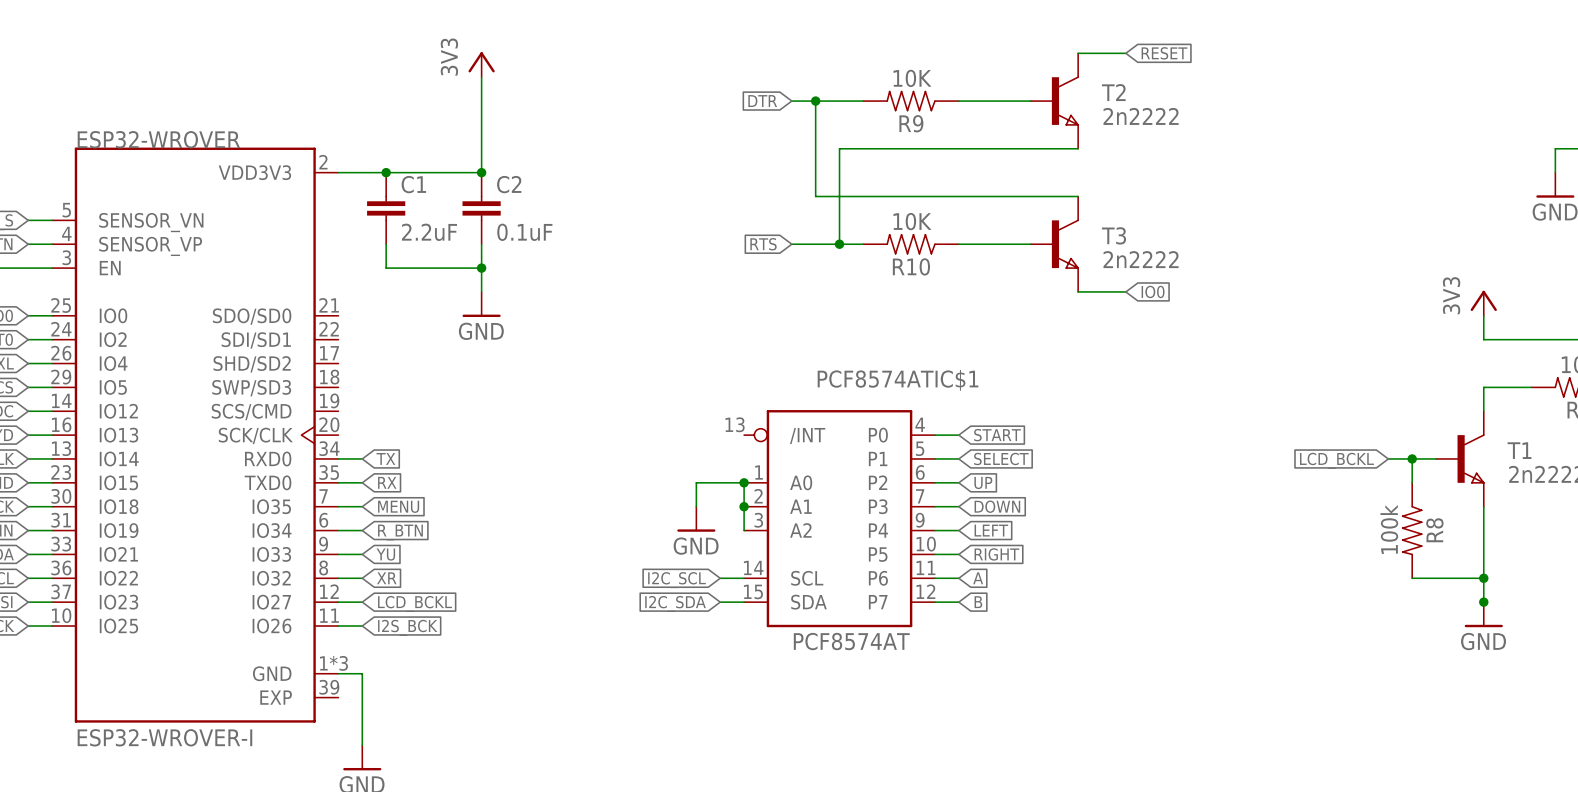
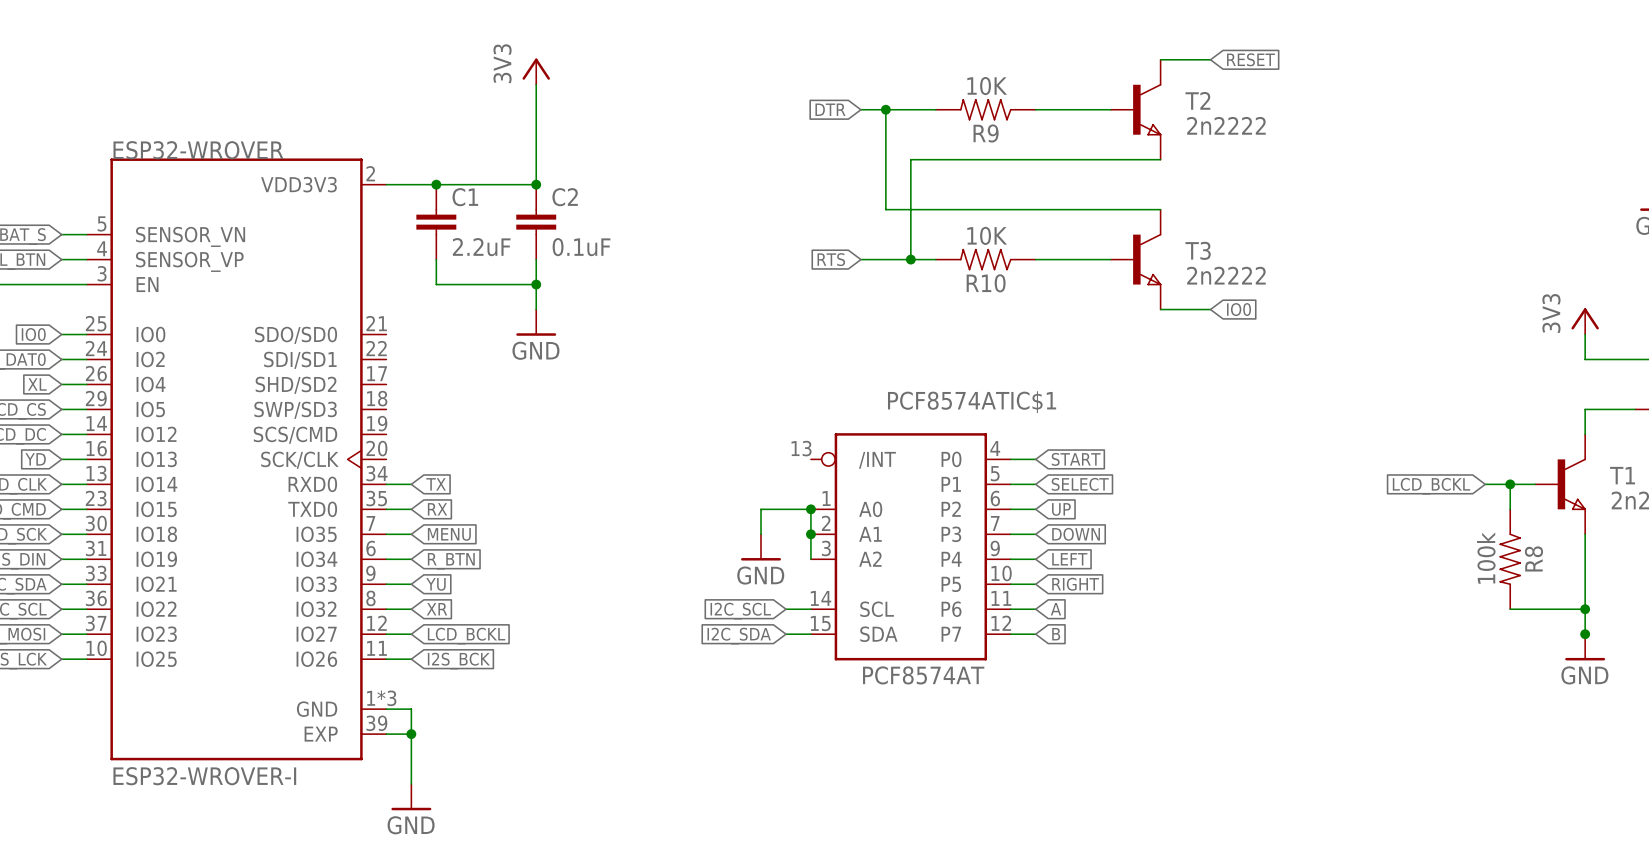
wire: none -> (386, 734) (411, 734)
junction: none -> (411, 734)

